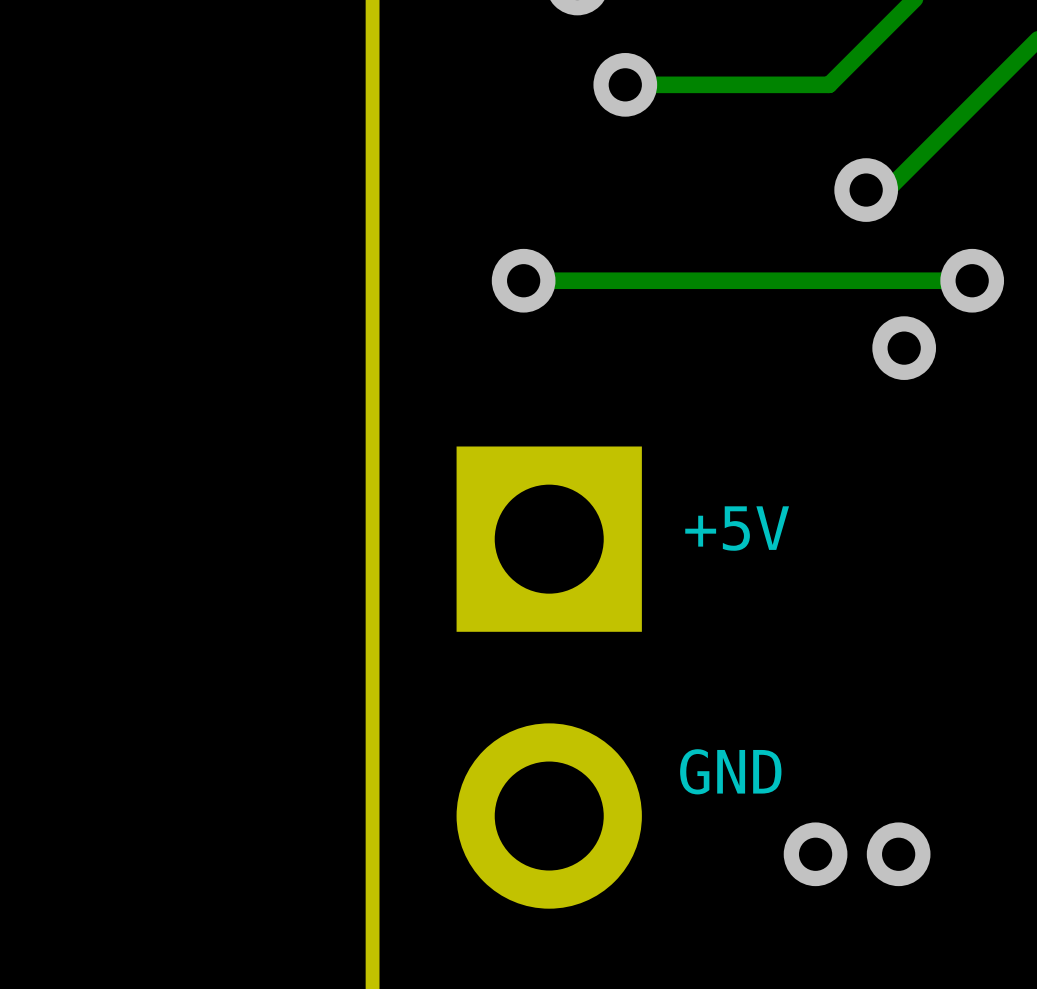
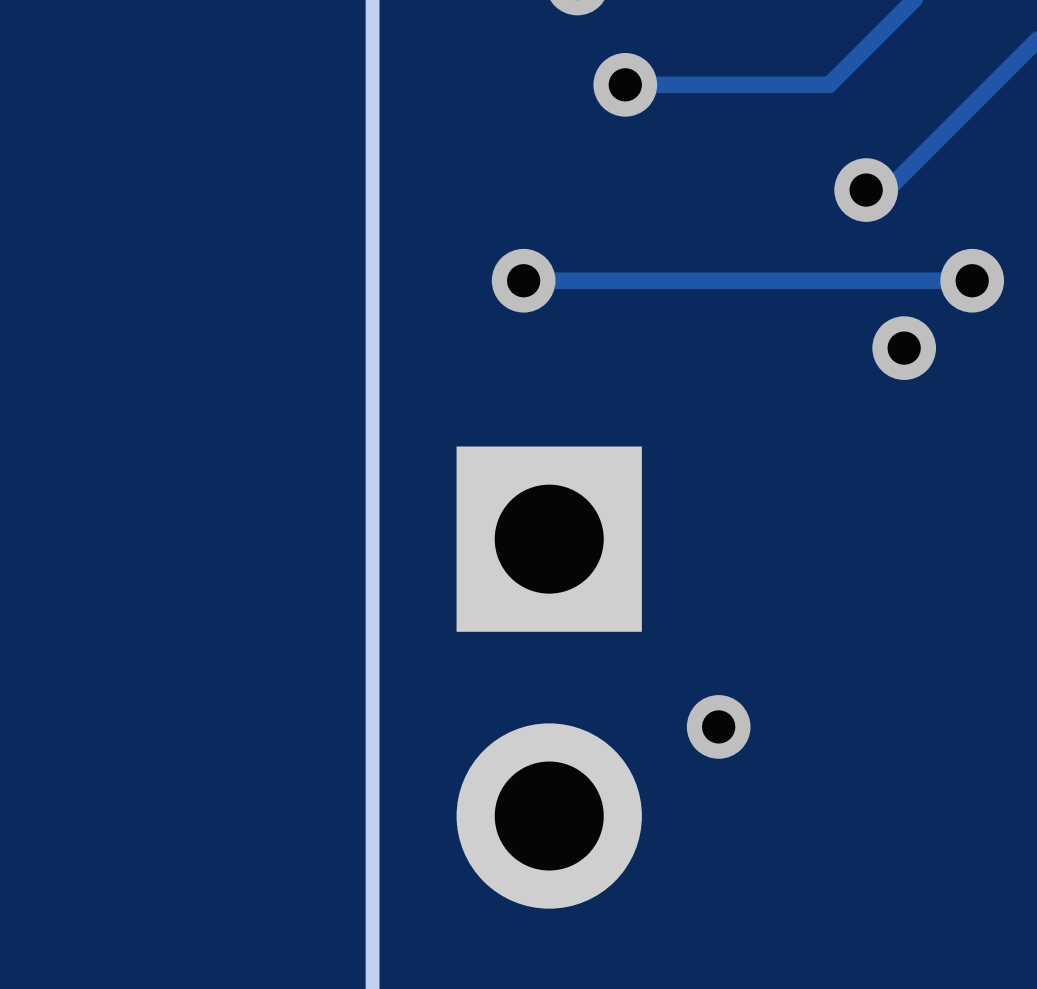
text: +5V (737, 528) -> none
via: none -> (718, 726)
text: GND (730, 771) -> none
via: (815, 854) -> none
via: (898, 854) -> none

